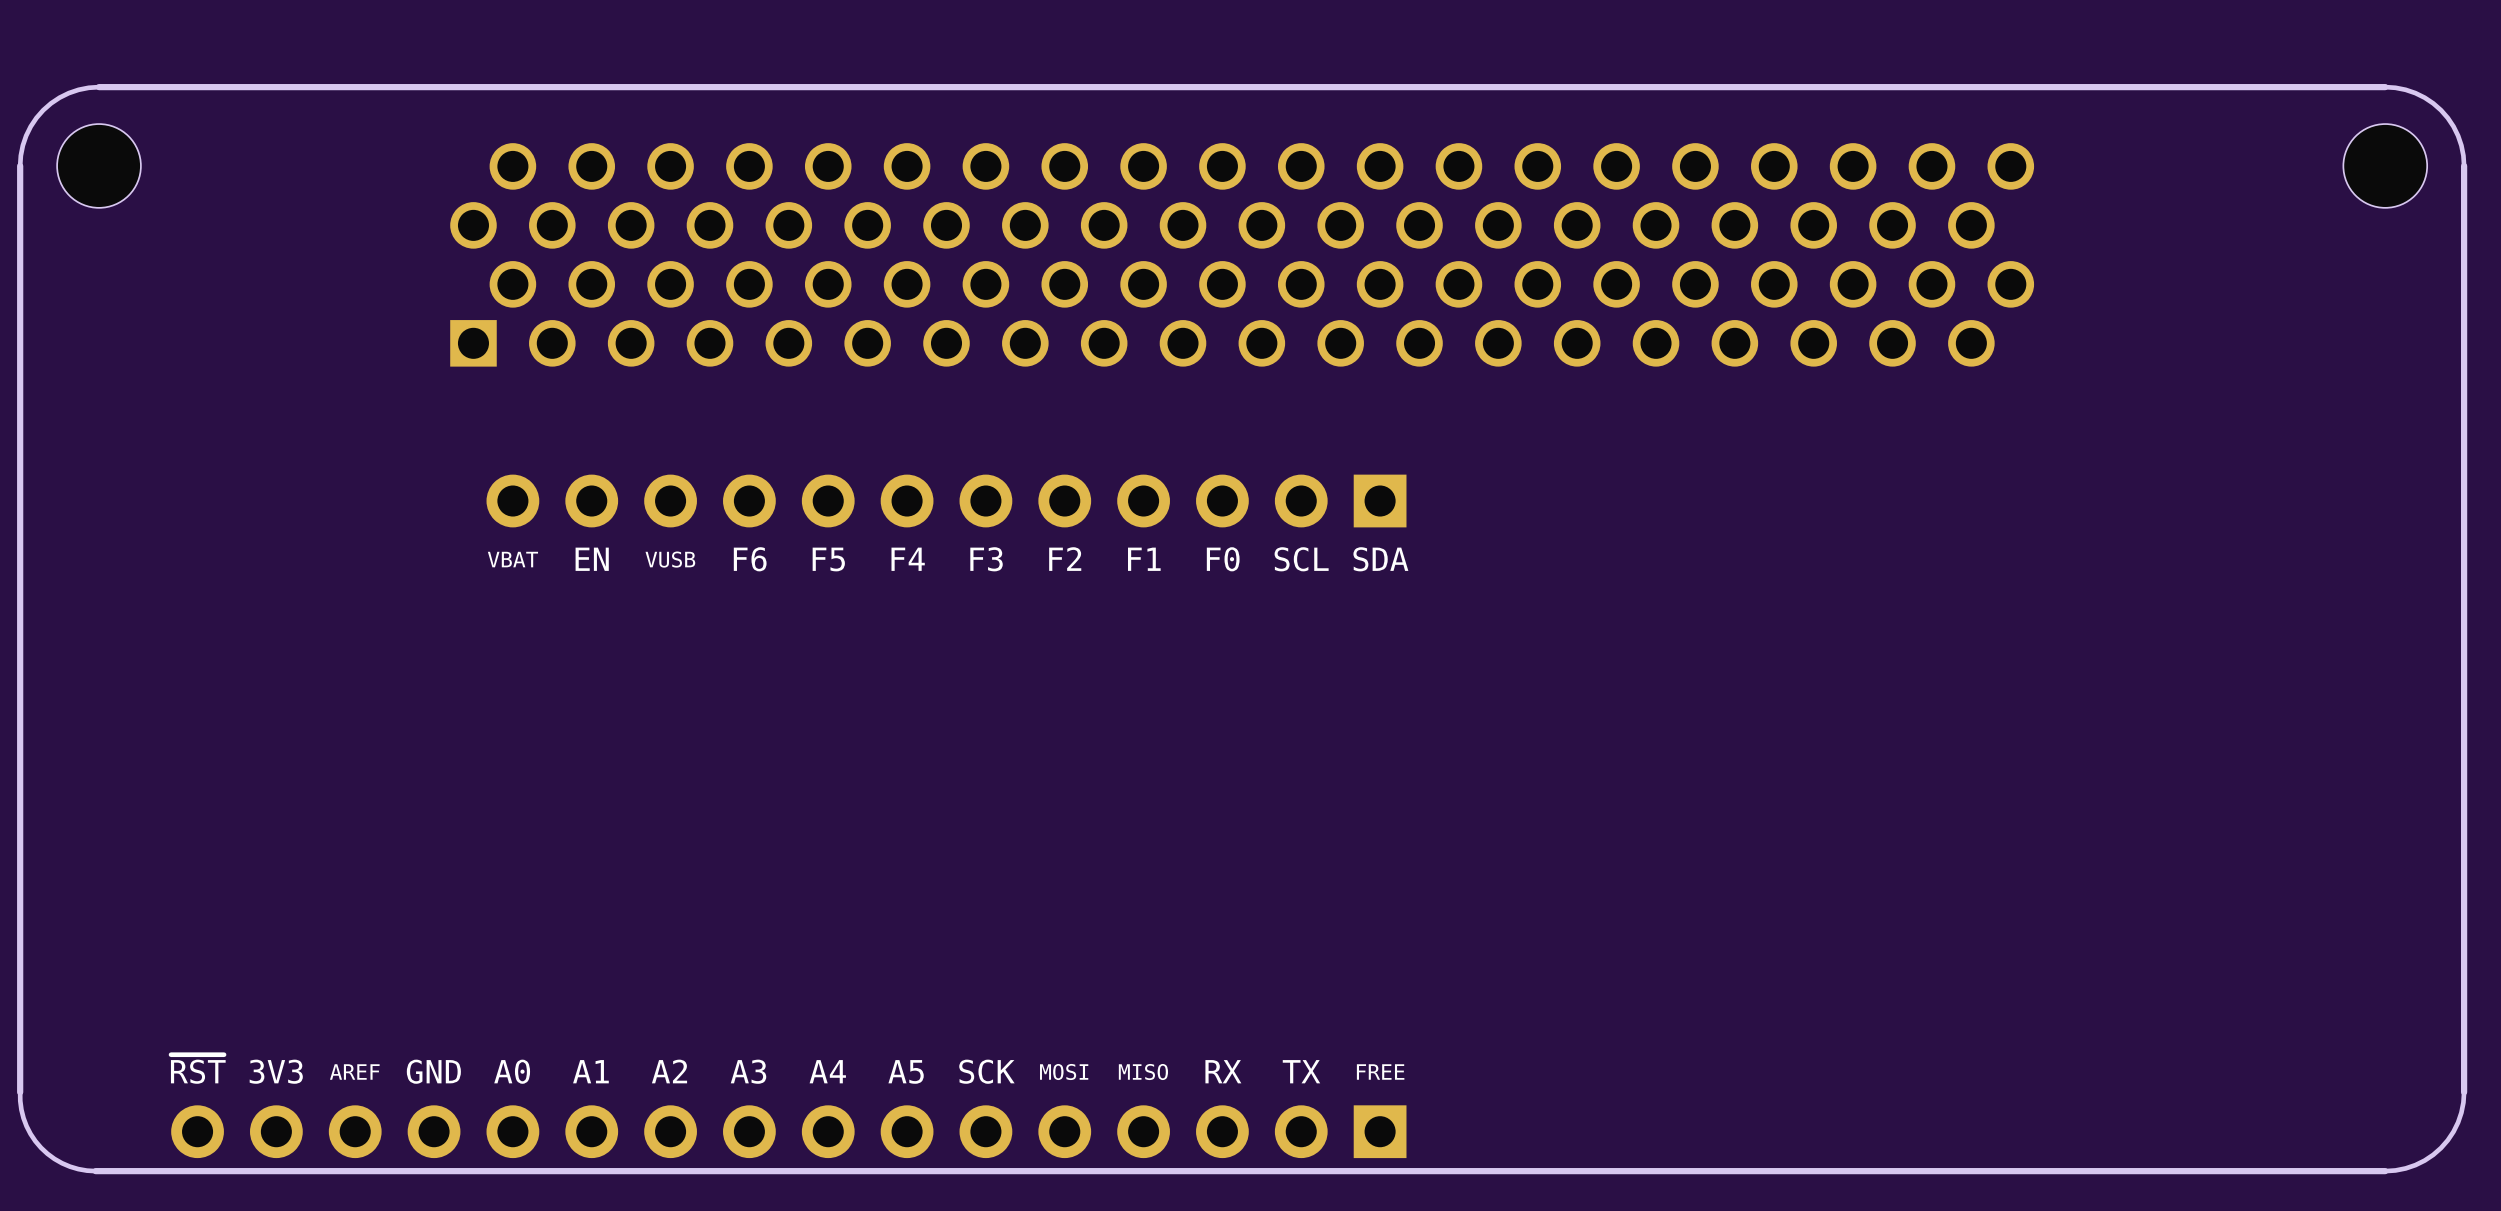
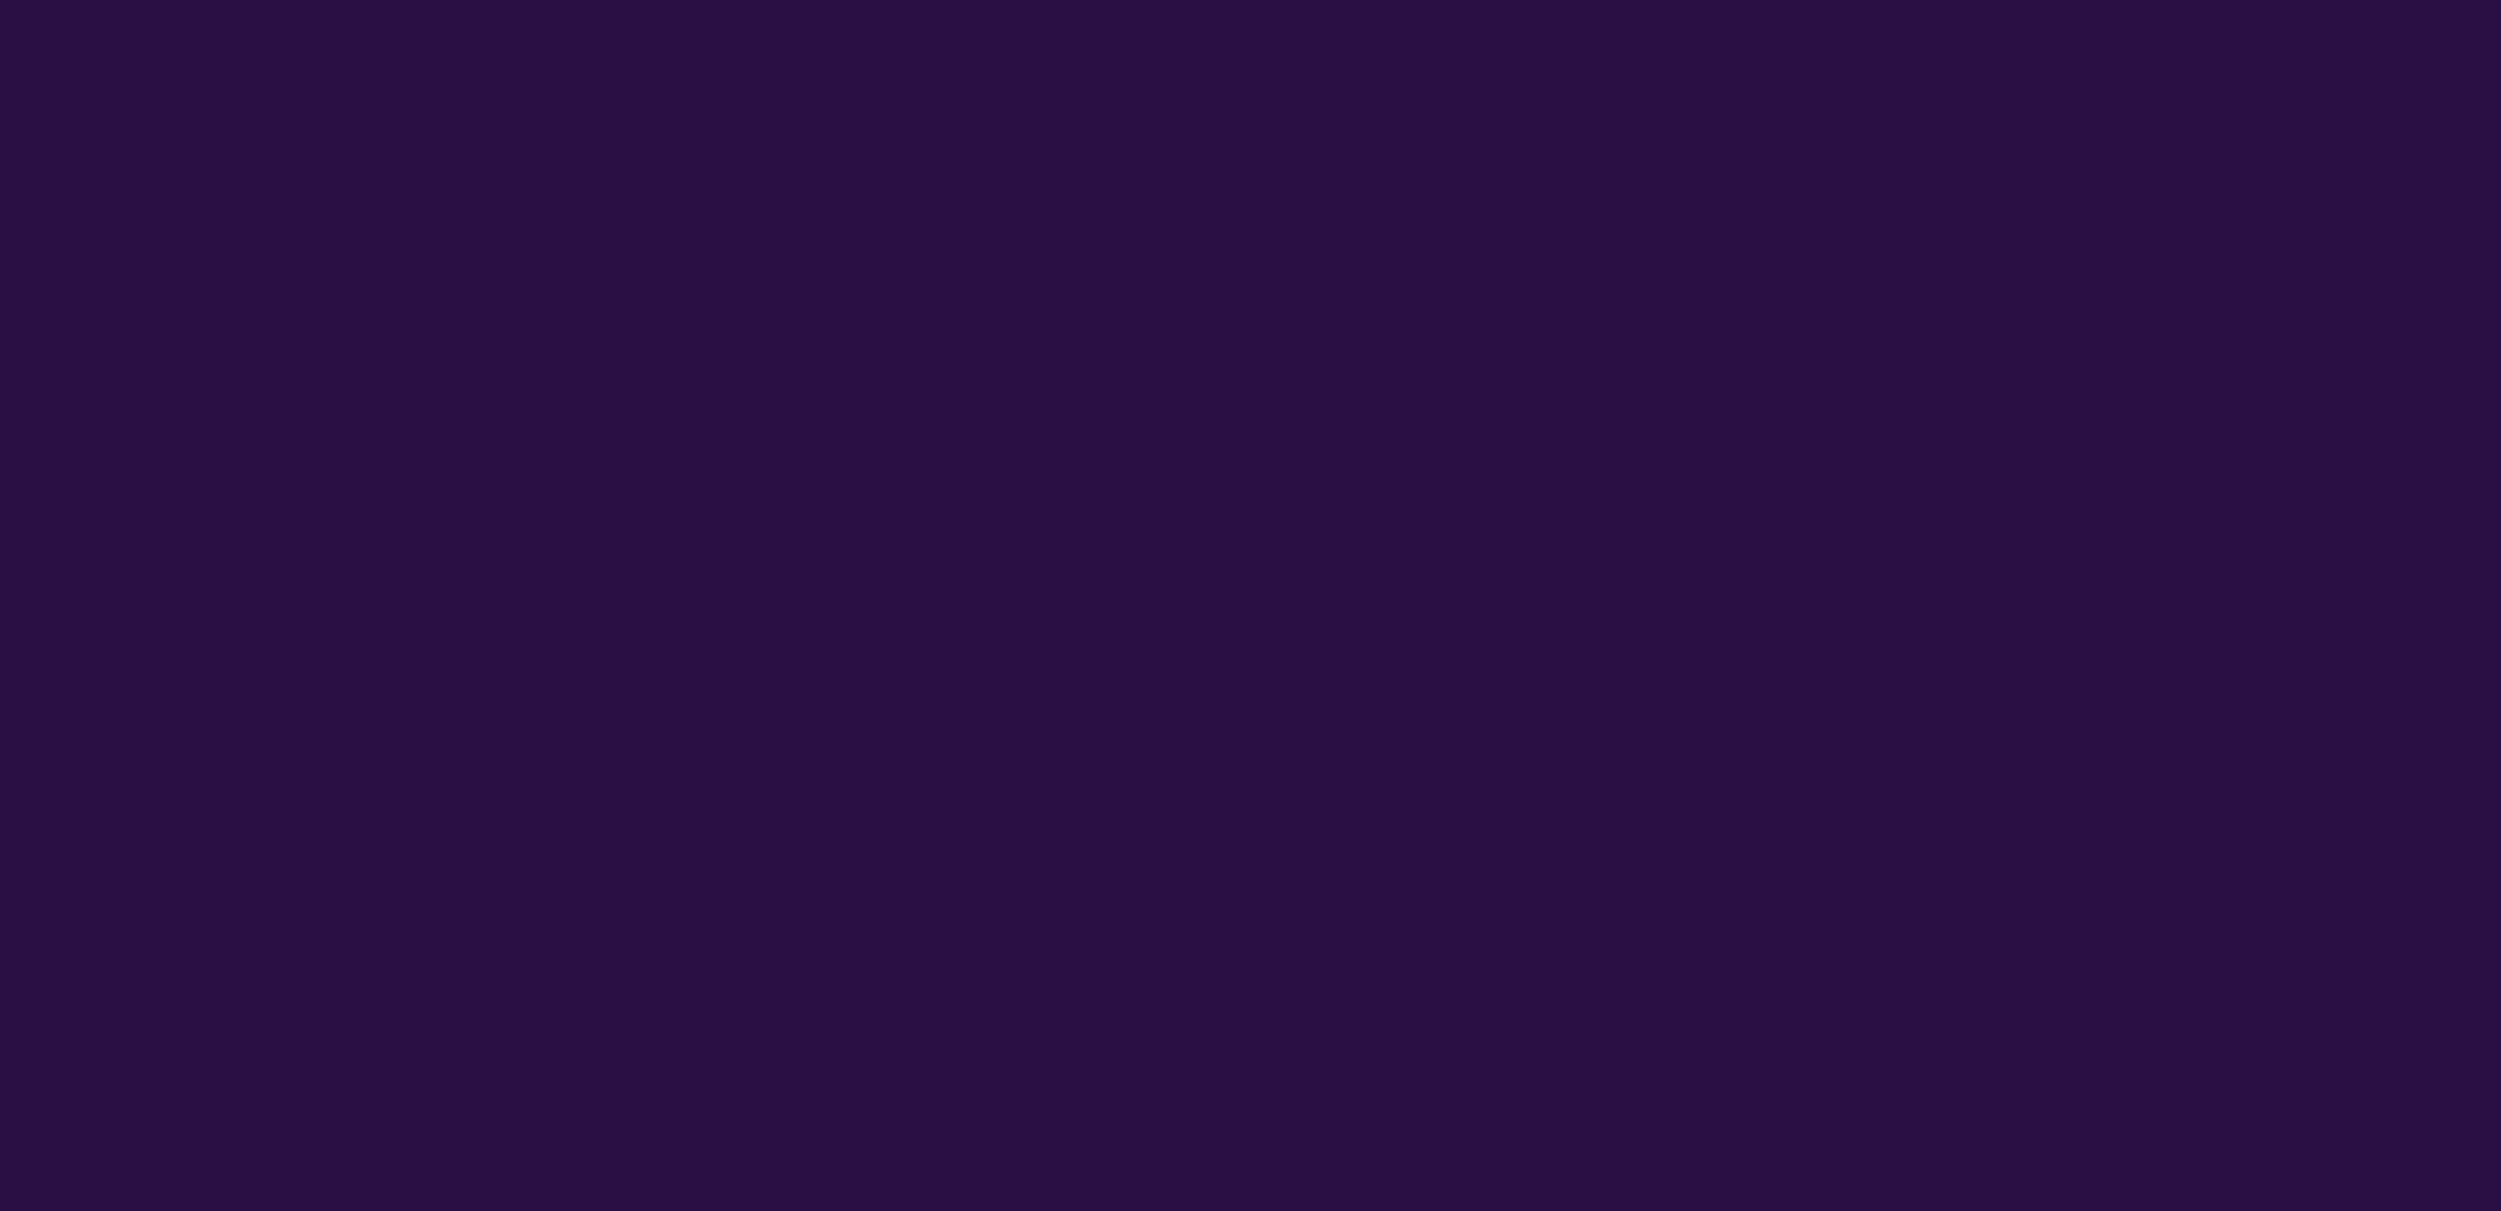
board edge: (99, 87) (2385, 87) (2415, 93) (2441, 110) (2453, 126) (2461, 145) (2464, 165) (2464, 1092) (2458, 1122) (2441, 1148) (2424, 1160) (2405, 1168) (2385, 1171) (95, 1171) (78, 1169) (62, 1163) (47, 1153) (30, 1133) (23, 1118) (20, 1100) (20, 165) (26, 135) (43, 110) (68, 93) (99, 87) -> none
part: (99, 165) -> none
part: (2385, 165) -> none
part: (1242, 254) -> none
part: (946, 501) -> none
text: VBAT (512, 559) -> none
text: EN (592, 559) -> none
text: VUSB (670, 559) -> none
text: F6 (750, 559) -> none
text: F5 (828, 559) -> none
text: F4 (908, 559) -> none
text: F3 (986, 559) -> none
text: F2 (1065, 559) -> none
text: F1 (1144, 559) -> none
text: F0 (1223, 559) -> none
text: SCL (1301, 559) -> none
text: SDA (1380, 559) -> none
text: ~{RST} (198, 1069) -> none
text: 3V3 (276, 1071) -> none
text: AREF (354, 1071) -> none
text: GND (433, 1071) -> none
text: A0 (512, 1071) -> none
text: A1 (590, 1071) -> none
text: A2 (669, 1071) -> none
text: A3 (748, 1071) -> none
text: A4 (827, 1071) -> none
text: A5 (906, 1071) -> none
text: SCK (986, 1071) -> none
text: RX (1223, 1071) -> none
text: TX (1301, 1071) -> none
text: FREE (1380, 1071) -> none
text: MOSI (1064, 1072) -> none
text: MISO (1143, 1072) -> none
part: (788, 1131) -> none

